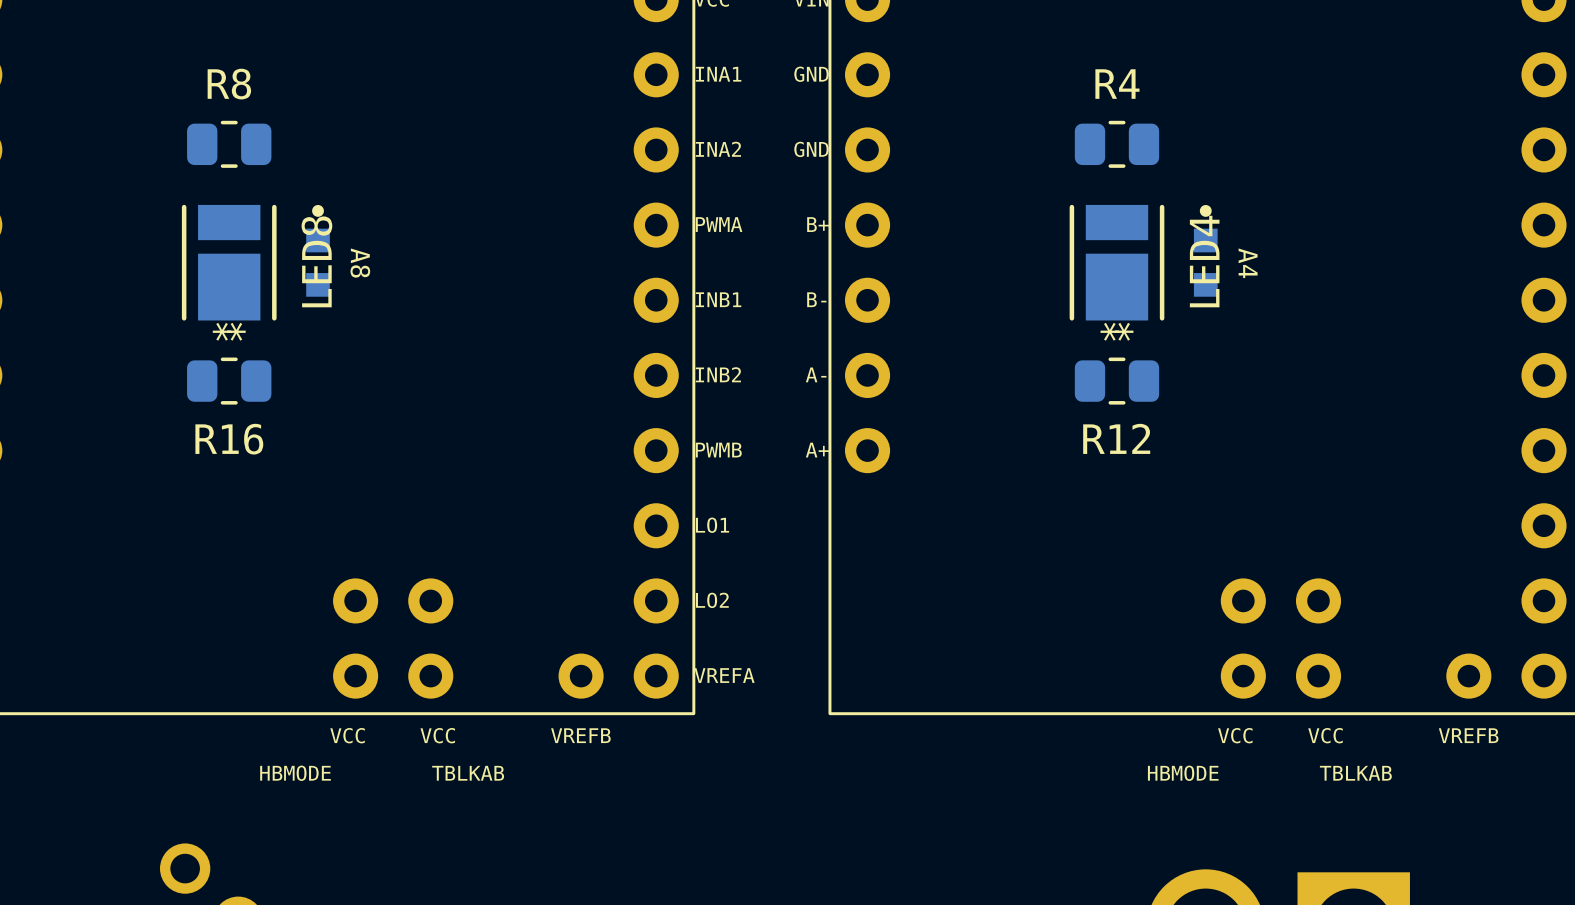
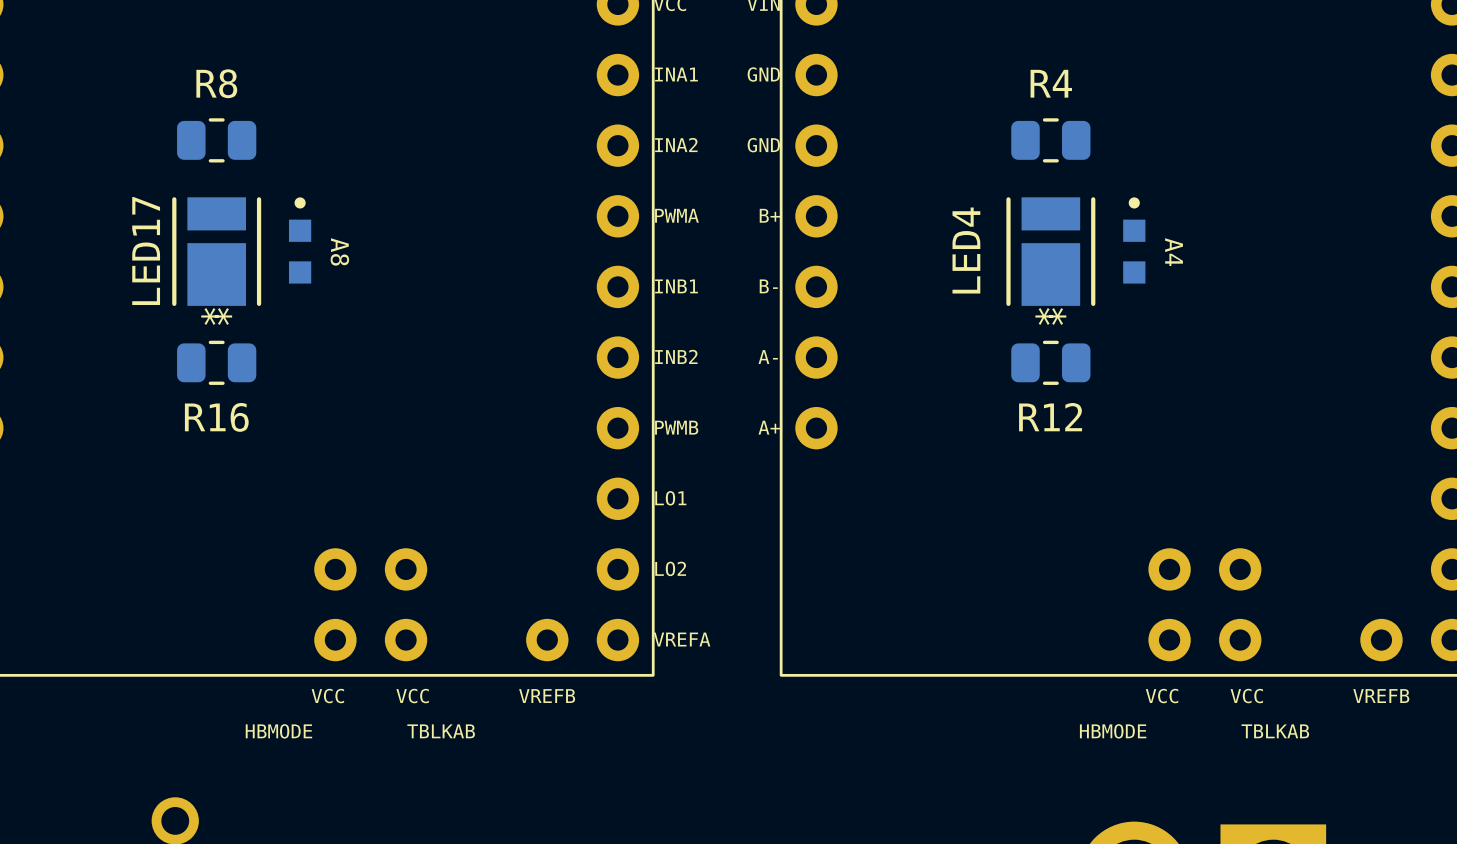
LED8 name: LED8 (316, 261) -> LED17 (146, 251)
LED4 name position: LED4 (1204, 261) -> LED4 (966, 250)

